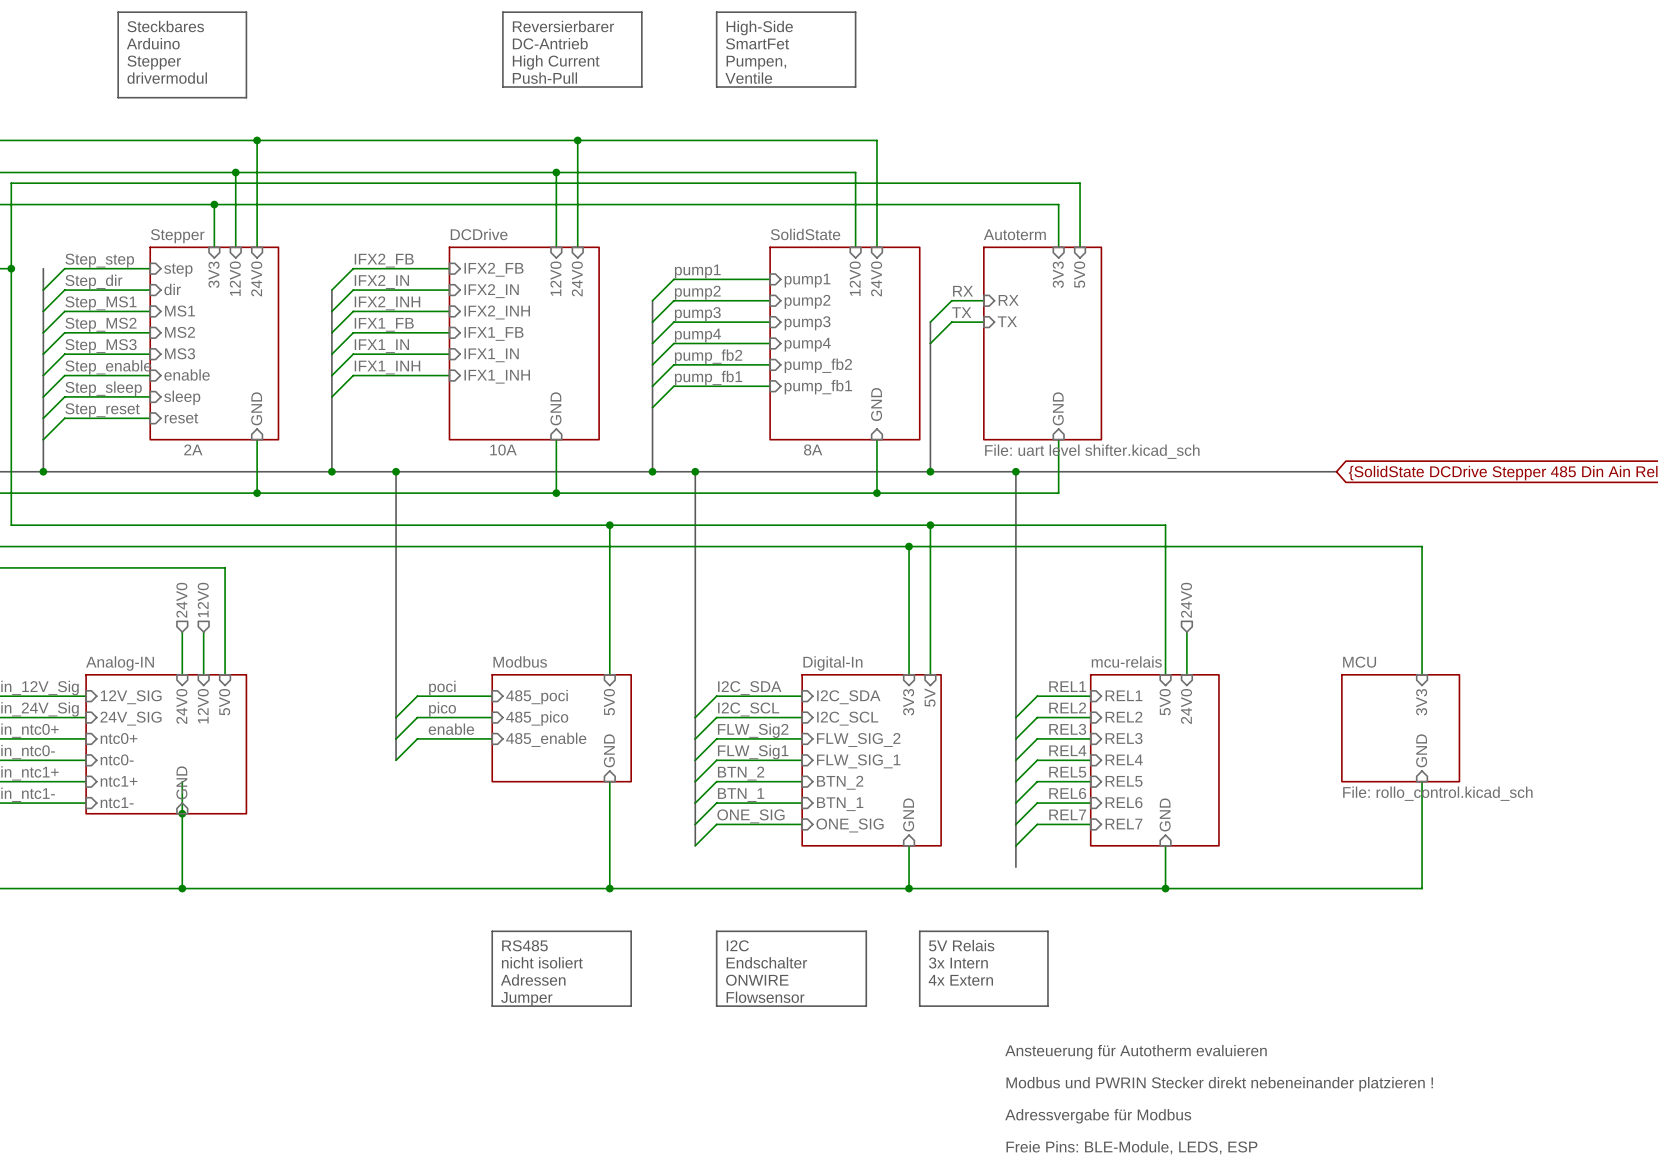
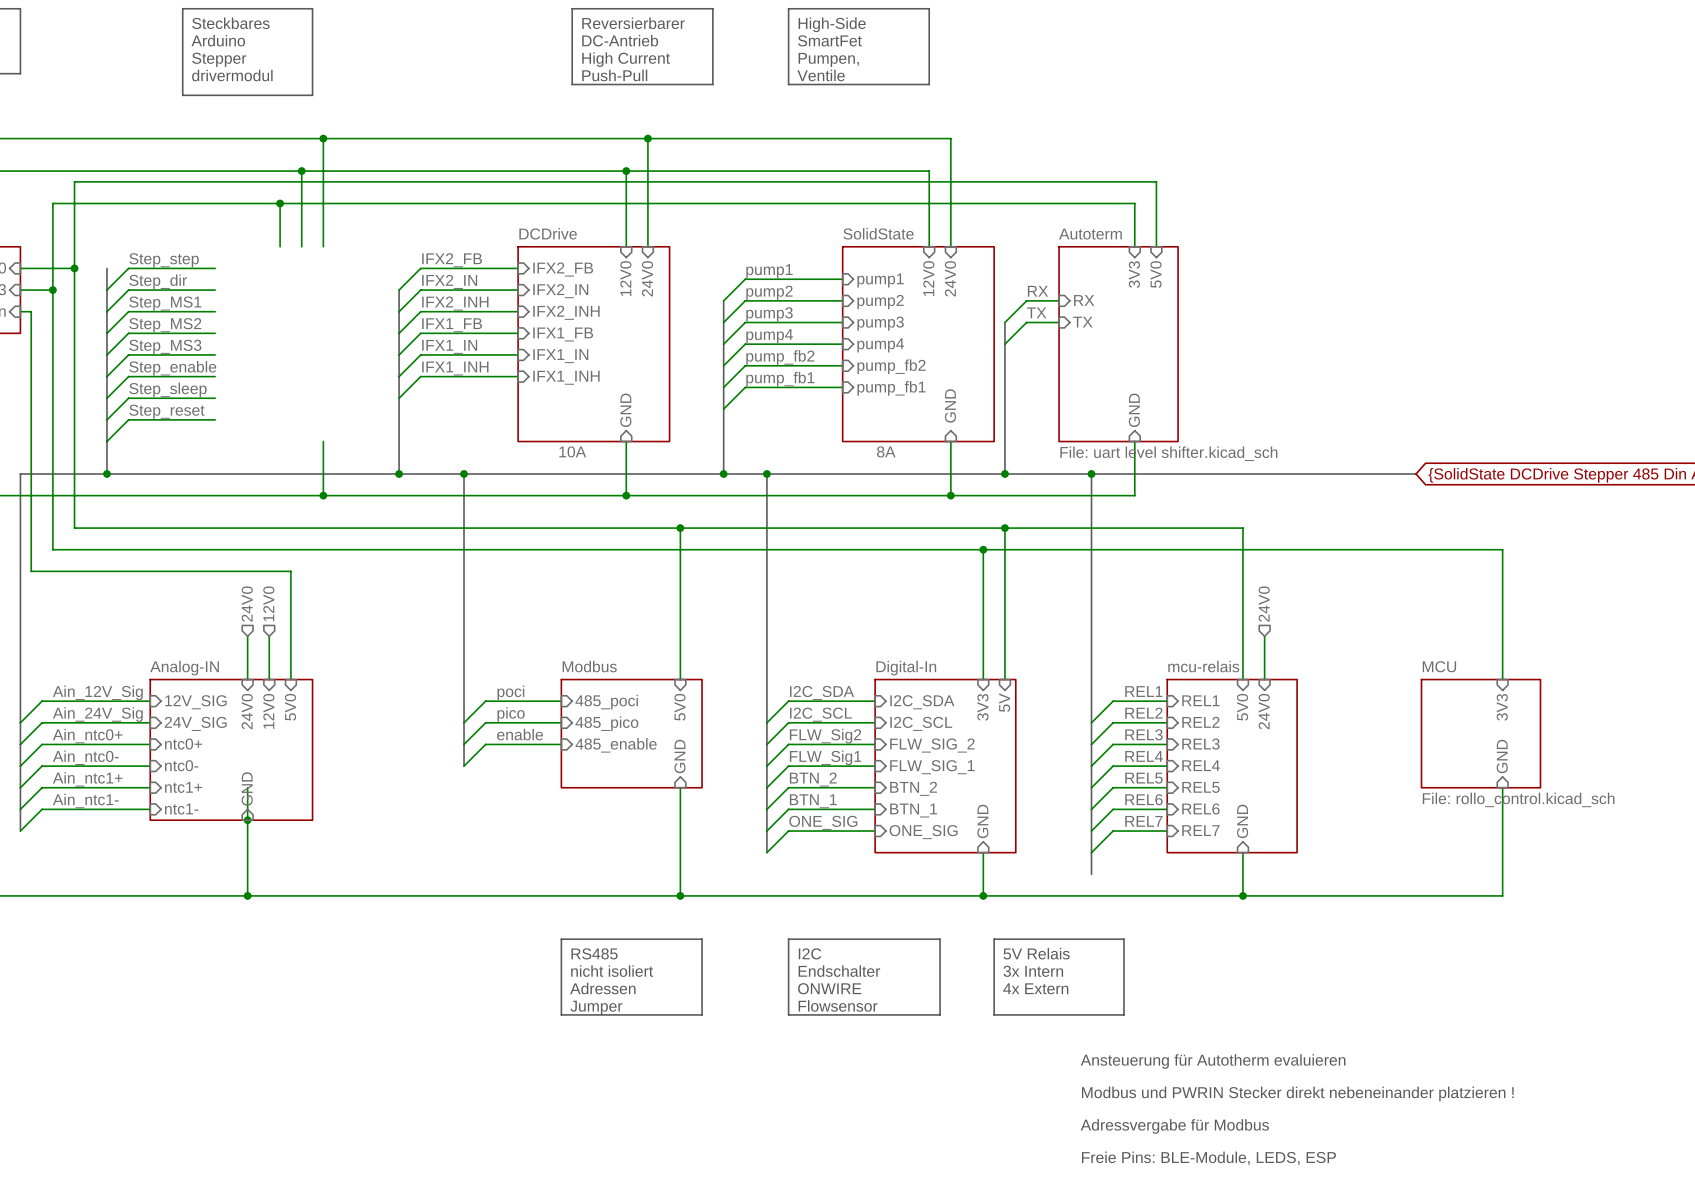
sheet pin: step (178, 270) -> none
sheet pin: 3V3 (213, 274) -> none
sheet pin: 12V0 (235, 278) -> none
sheet pin: 24V0 (256, 278) -> none
sheet pin: dir (172, 289) -> none
sheet pin: MS1 (180, 311) -> none
sheet pin: MS2 (180, 332) -> none
sheet Stepper: (214, 343) -> none
sheet pin: MS3 (180, 353) -> none
sheet pin: enable (187, 374) -> none
sheet pin: sleep (182, 397) -> none
sheet pin: GND (256, 408) -> none
sheet pin: reset (181, 418) -> none

